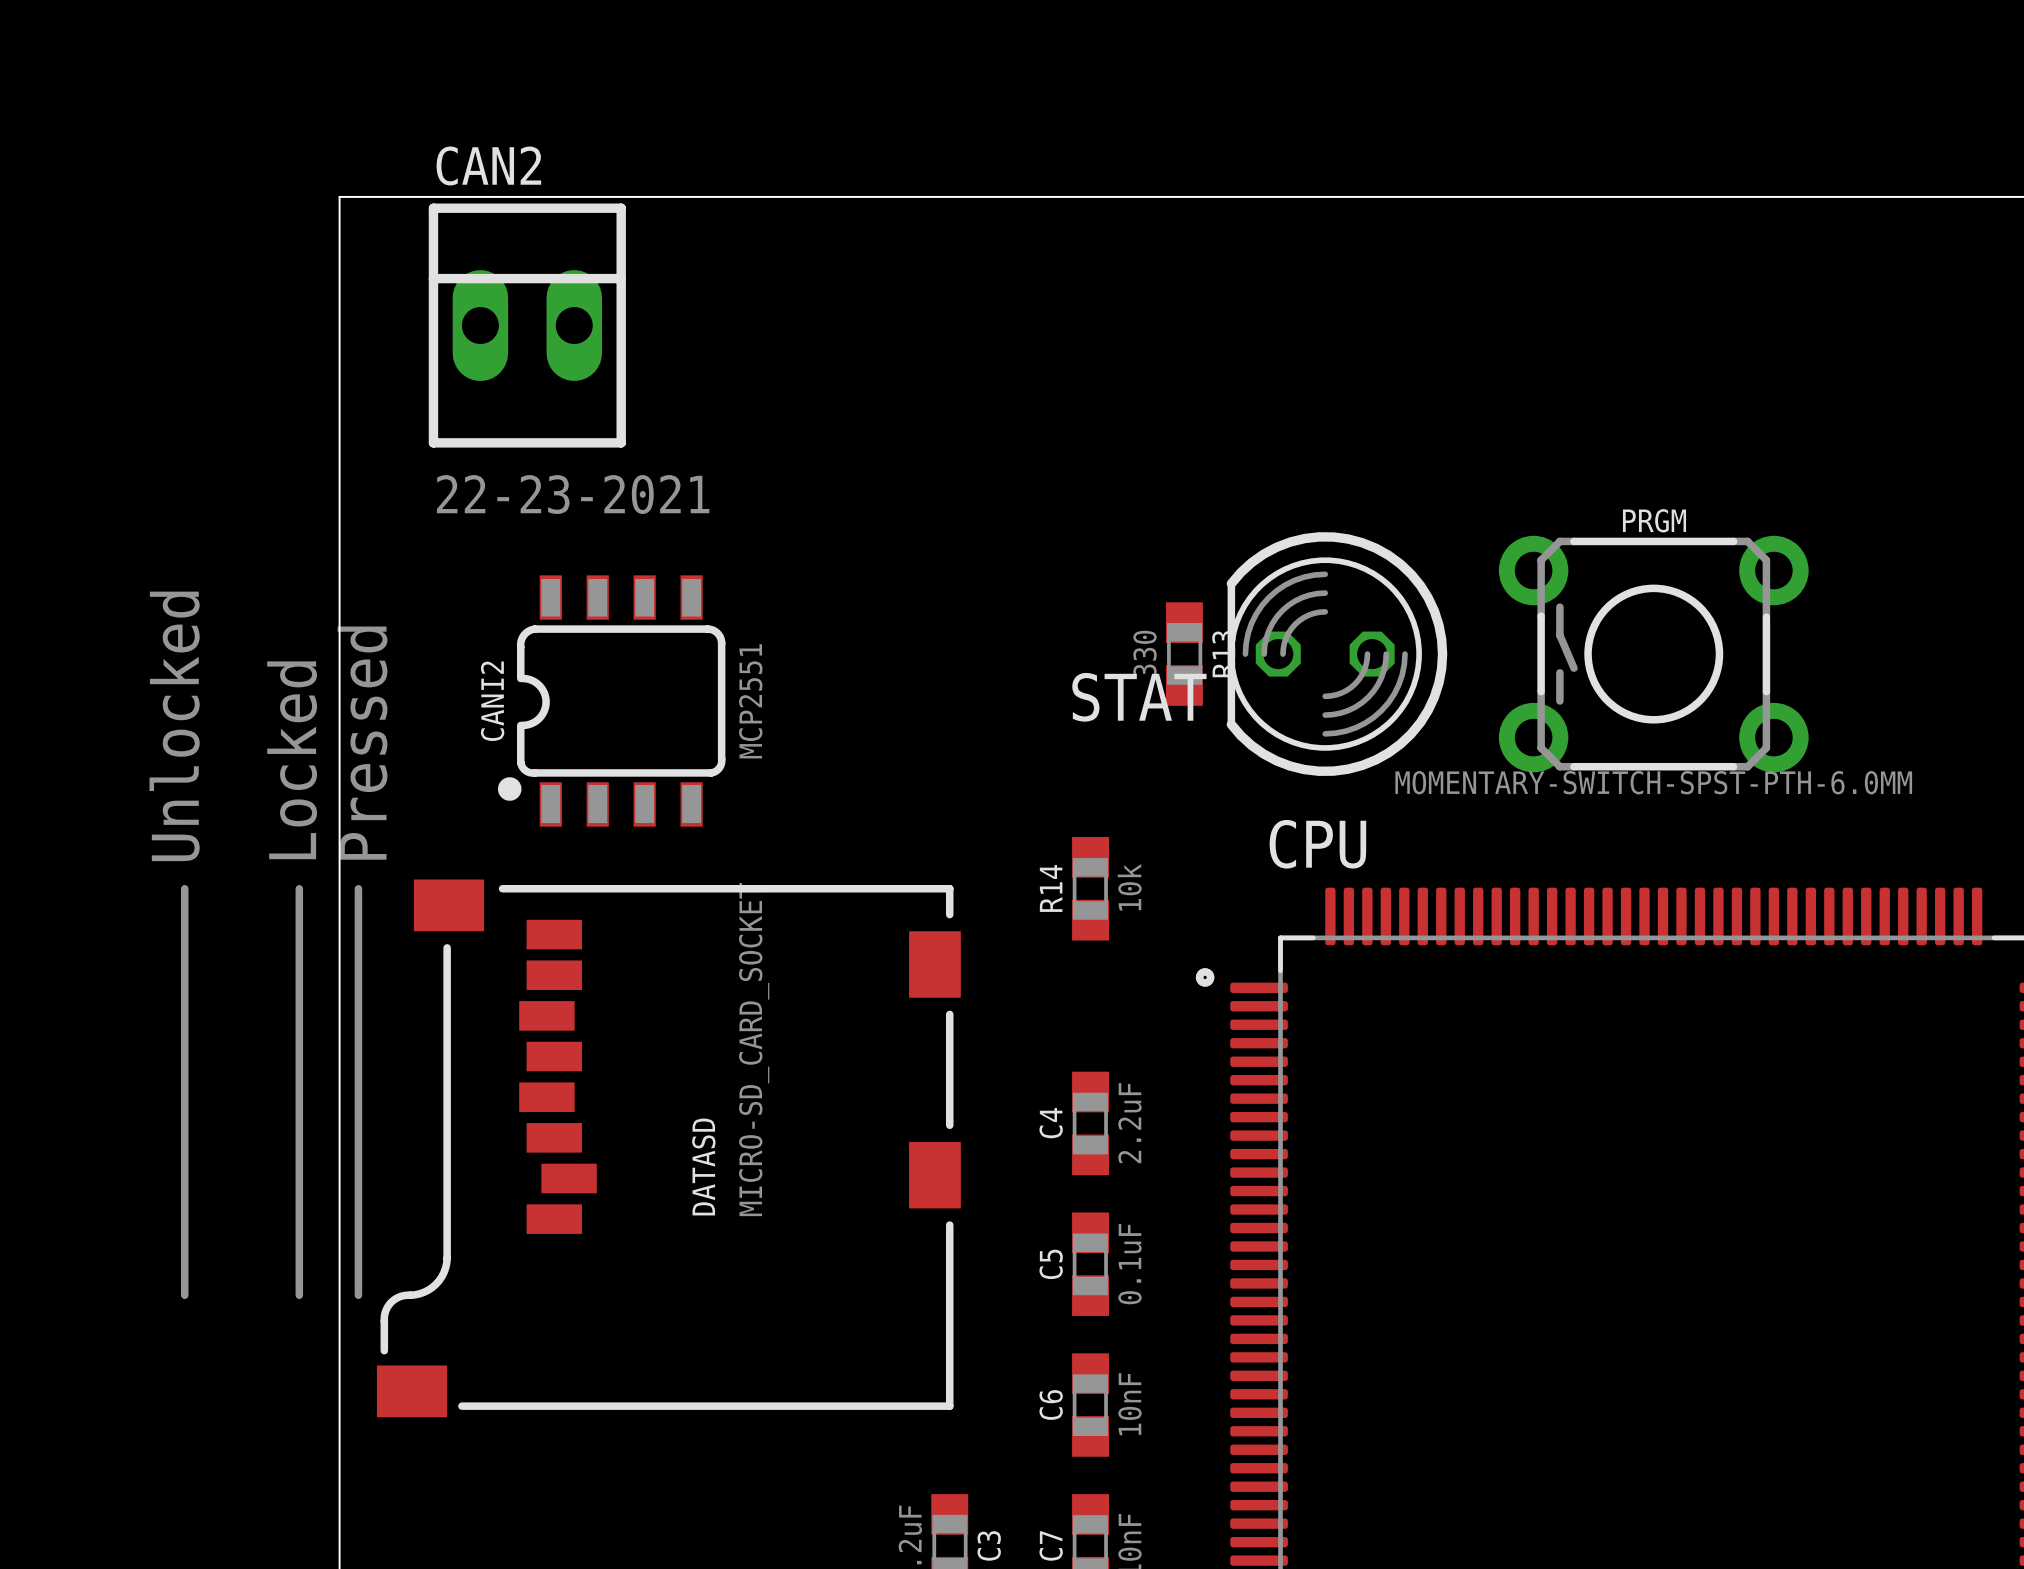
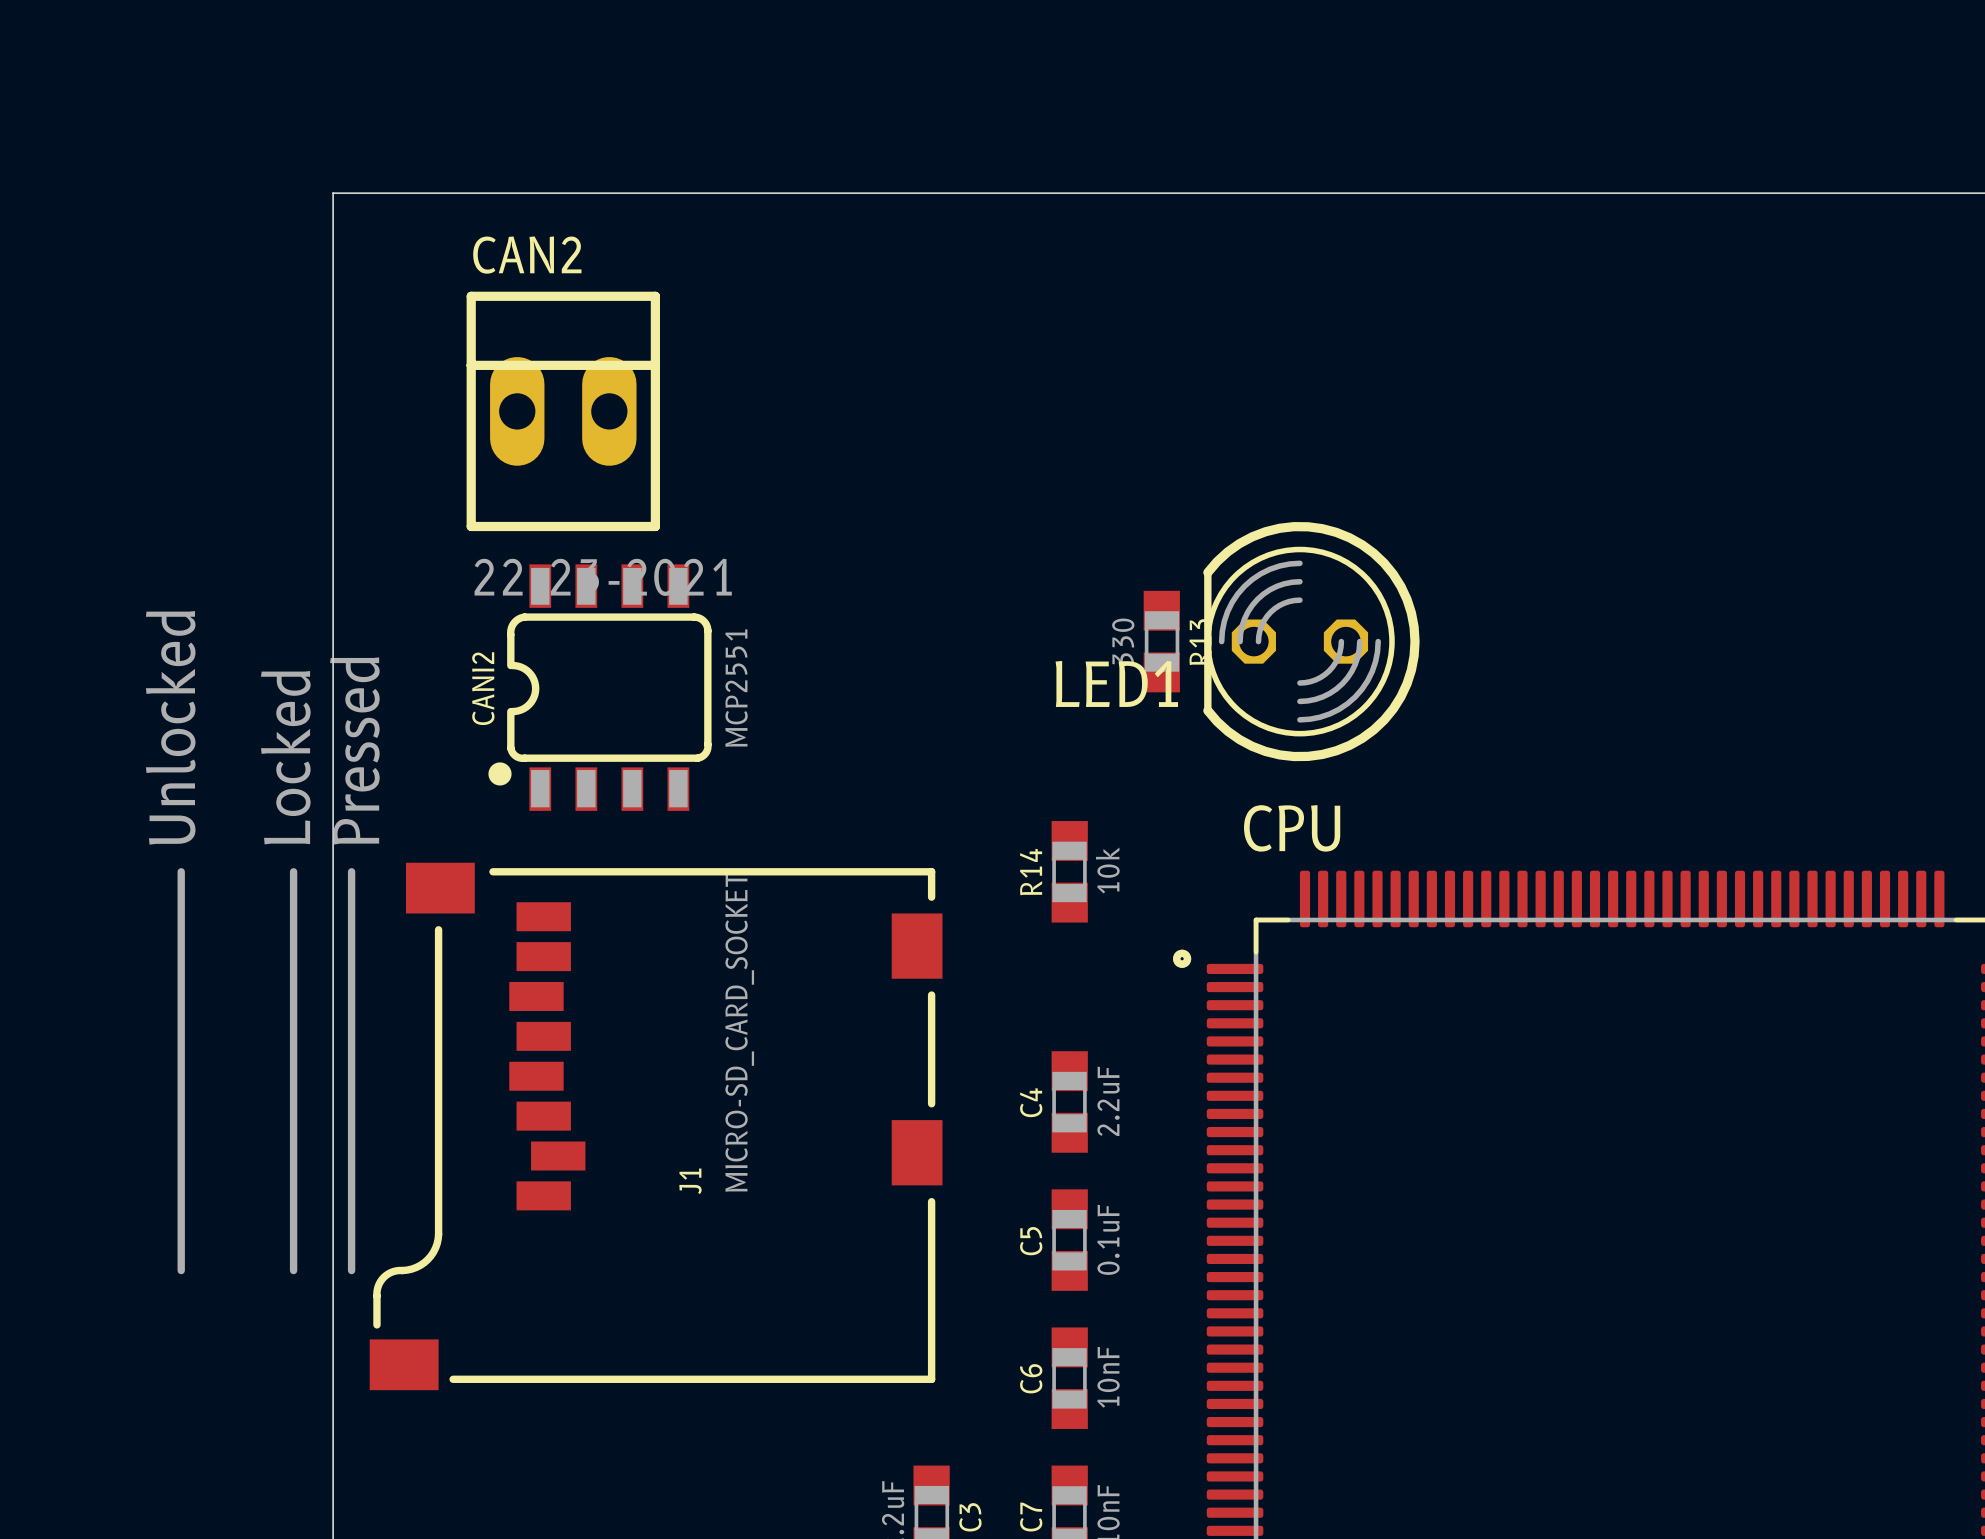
CAN2 position: (527, 325) -> (563, 411)
PRGM: MOMENTARY-SWITCH-SPST-PTH-6.0MM (1653, 654) -> none
STAT name: STAT (1139, 697) -> LED1 (1116, 683)
DATASD name: DATASD (703, 1167) -> J1 (690, 1181)

